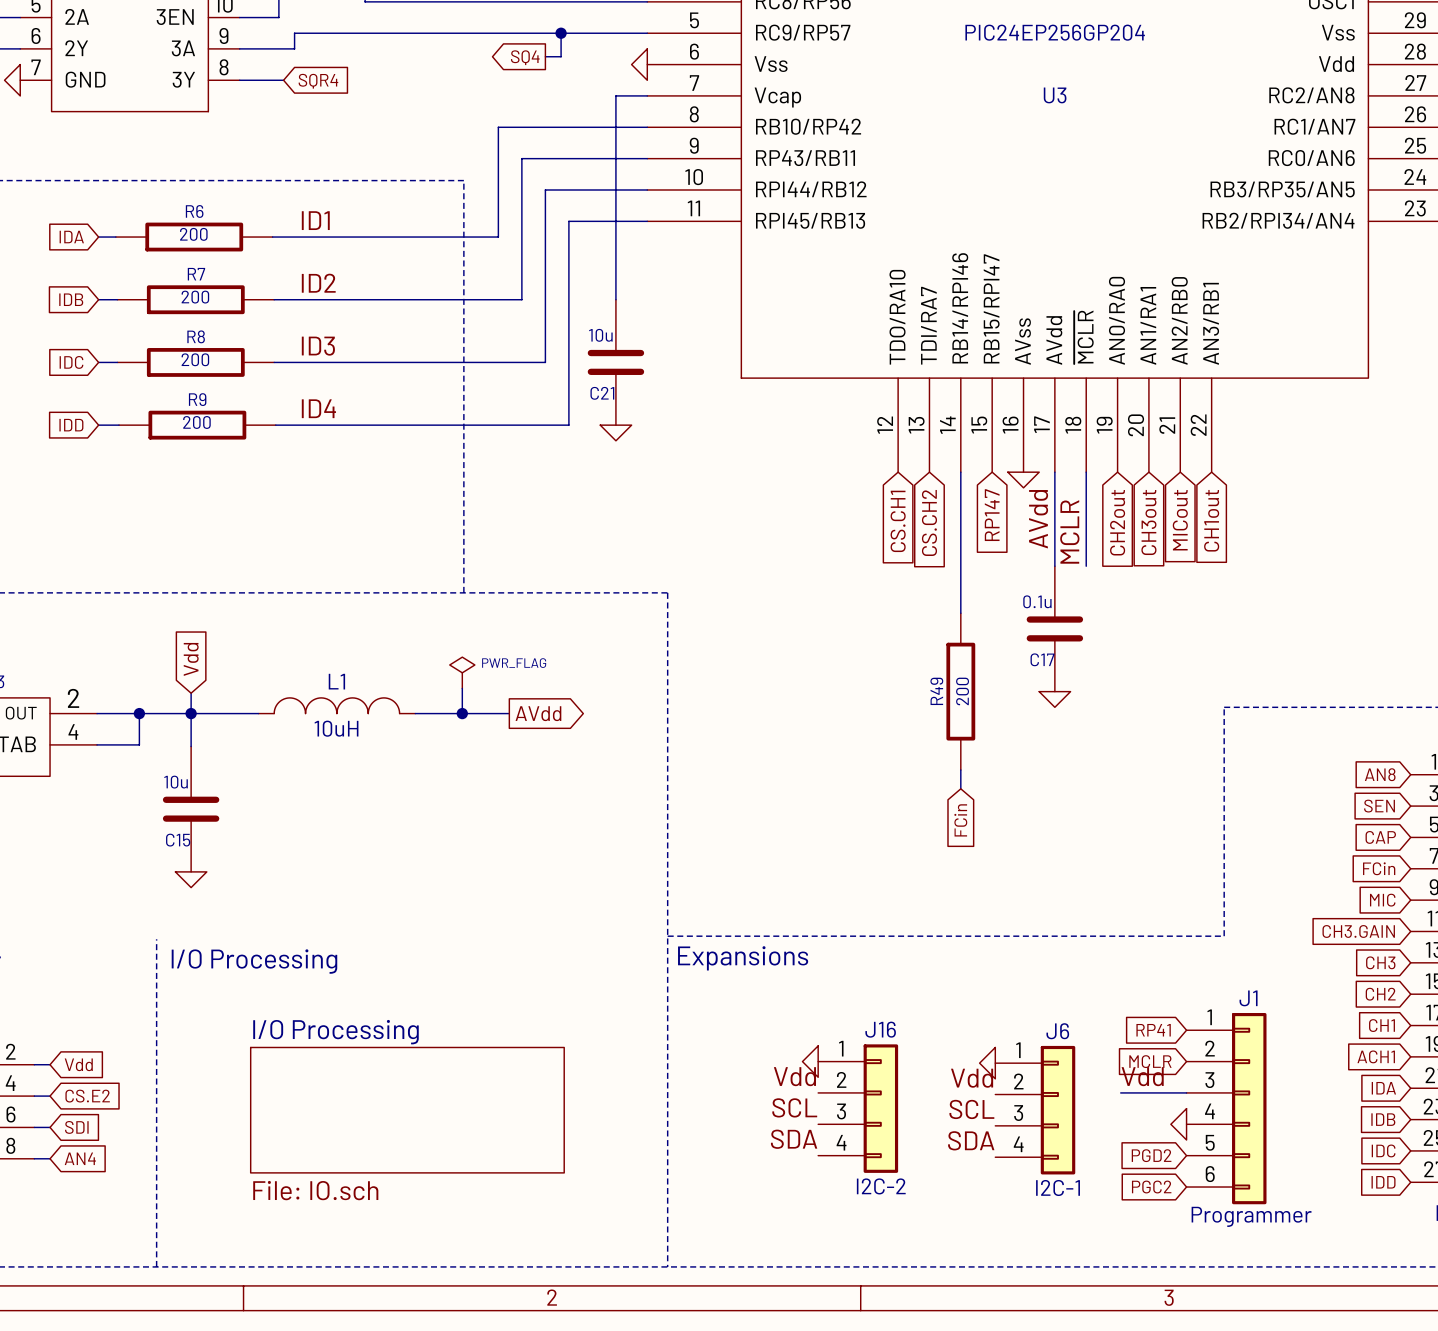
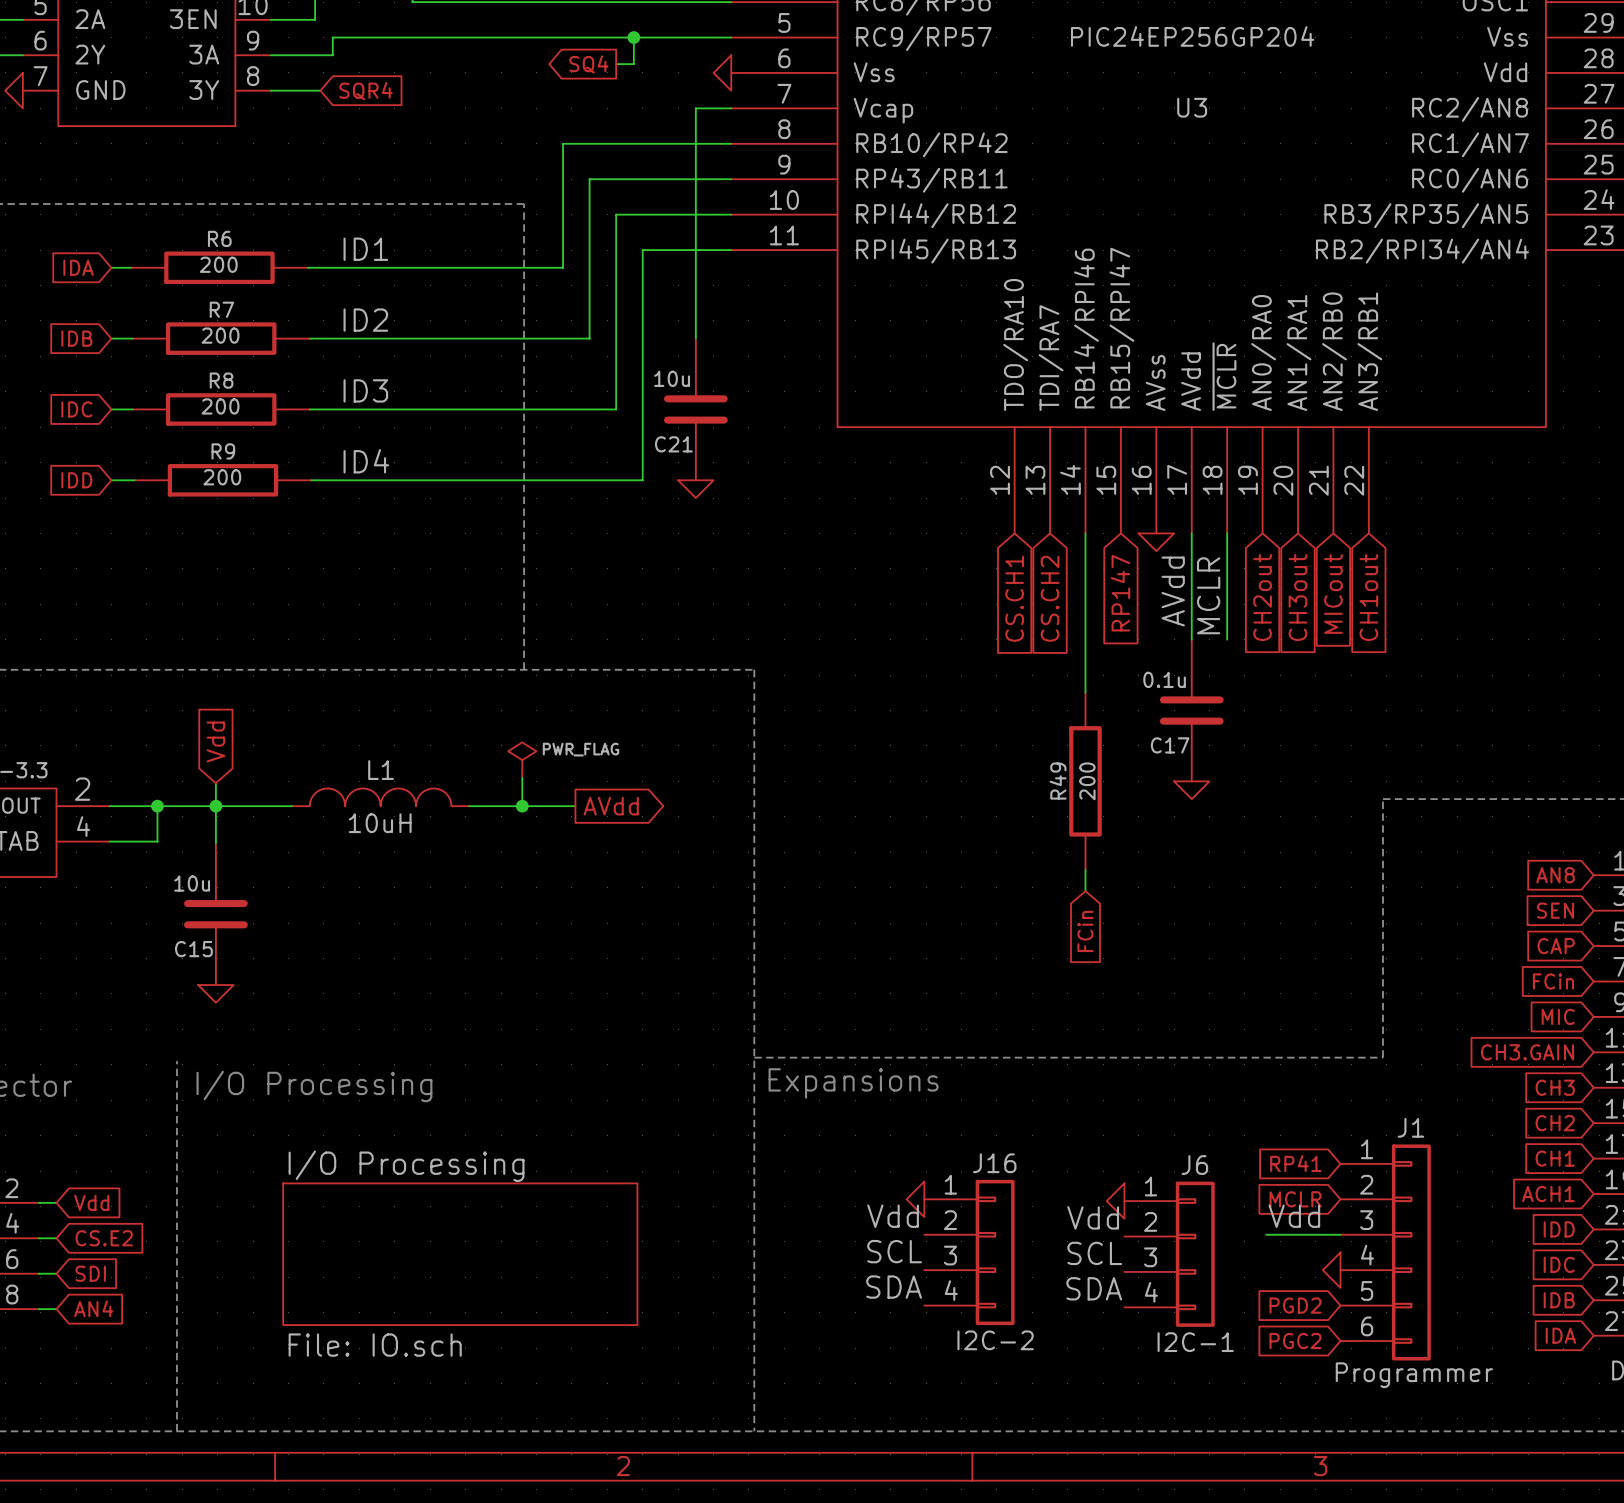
global label: IDA (1383, 1088) -> IDD (1559, 1229)
global label: IDB (1383, 1119) -> IDC (1559, 1264)
global label: IDC (1383, 1150) -> IDB (1559, 1300)
global label: IDD (1383, 1182) -> IDA (1560, 1335)

